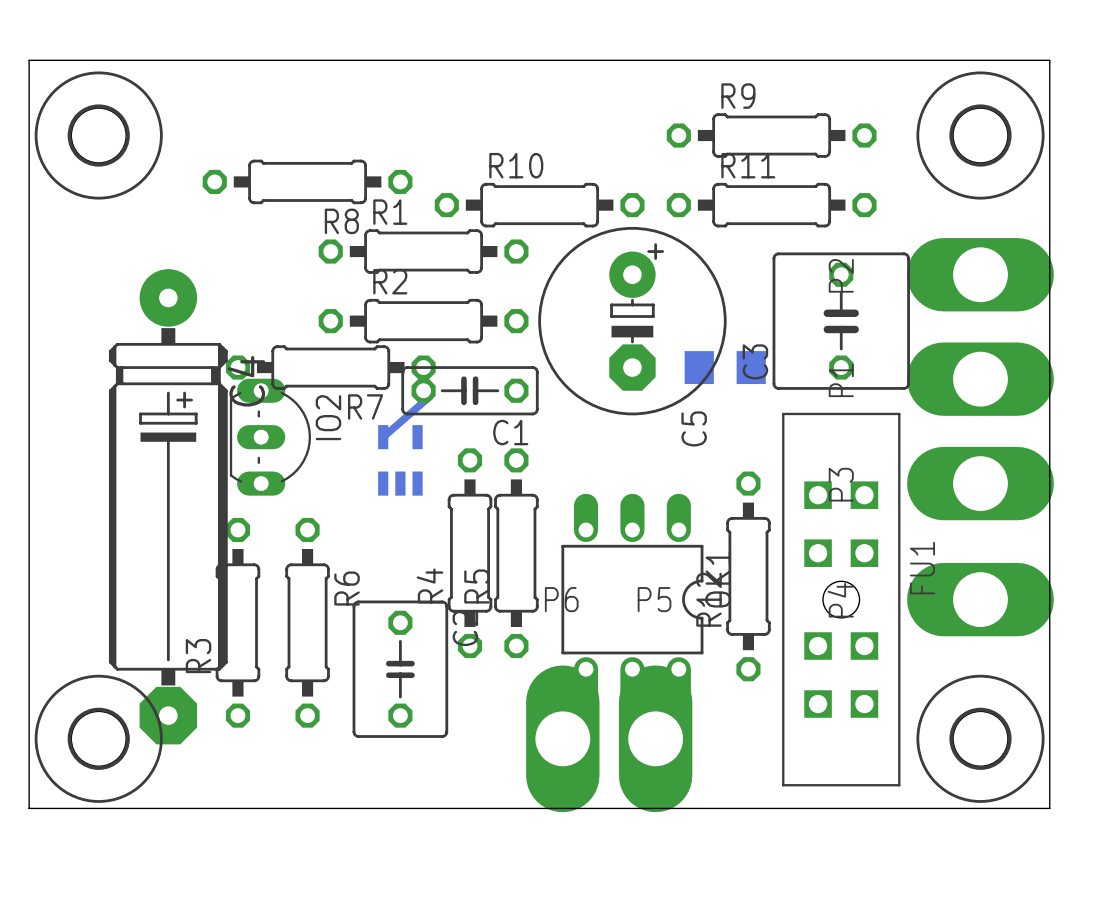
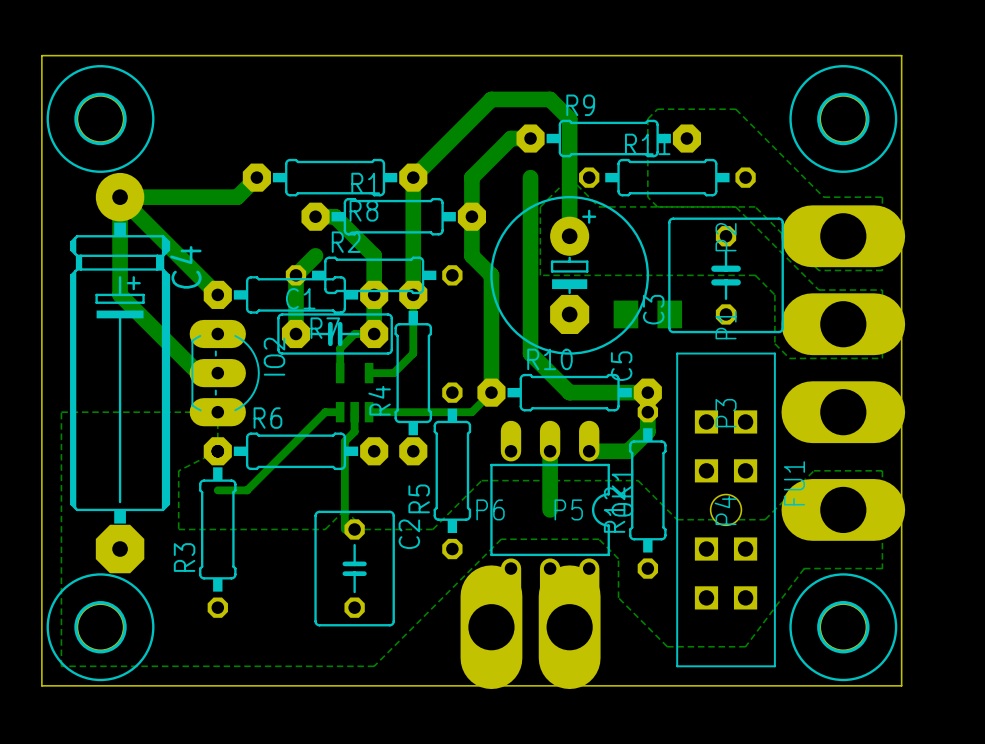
R9 footprint: [666, 113, 877, 158] -> [516, 119, 702, 158]
bottom track: none -> (530, 138) (511, 138) (471, 177) (471, 255) (491, 275) (491, 392) (471, 412) (369, 412)
R8 footprint: [202, 159, 413, 205] -> [242, 158, 428, 197]
R10 footprint: [434, 182, 645, 228] -> [477, 373, 662, 412]
bottom track: none -> (256, 177) (237, 197) (120, 197)
bottom track: none -> (530, 177) (530, 353) (569, 392) (647, 392) (647, 431) (628, 451) (589, 451)
bottom track: none -> (120, 197) (217, 294)
bottom track: none -> (120, 197) (120, 294) (198, 373) (217, 373)
R1 footprint: [318, 229, 529, 274] -> [301, 197, 486, 236]
bottom zone outline: none -> (657, 206) (647, 197) (647, 118) (657, 109) (735, 109) (823, 197) (882, 197) (882, 270) (818, 270) (755, 206) (598, 206) (569, 177) (540, 206) (540, 275) (755, 275) (774, 294) (774, 343) (789, 358) (882, 358) (882, 290) (818, 290) (735, 206)
bottom track: none -> (569, 236) (569, 118) (550, 99) (491, 99) (413, 177) (413, 353) (393, 373) (369, 373)
bottom track: none -> (315, 255) (295, 275) (295, 334)
C5 position: (632, 321) -> (569, 275)
R7 footprint: [225, 345, 436, 390] -> [203, 276, 389, 314]
C1 footprint: [401, 366, 539, 416] -> [277, 313, 393, 355]
part position: (725, 367) -> (647, 314)
IO2 footprint: [229, 378, 312, 496] -> [189, 319, 260, 427]
bottom track: (423, 390) (429, 396) (383, 437) -> (315, 216) (335, 216) (374, 255) (374, 334) (354, 334) (340, 348) (340, 373)
C1 name position: C1 (510, 432) -> C1 (300, 298)
R4 footprint: [447, 448, 493, 659] -> [394, 280, 433, 466]
bottom zone outline: none -> (61, 412) (61, 666) (374, 666) (501, 539) (598, 539) (618, 558) (618, 597) (667, 646) (745, 646) (804, 568) (882, 568) (882, 470) (813, 470) (765, 519) (677, 519) (638, 480) (481, 480) (432, 529) (364, 529) (344, 509) (325, 529) (178, 529) (178, 470) (217, 451) (217, 412) (61, 412)
bottom track: none -> (340, 412) (325, 412) (247, 490) (217, 490)
bottom track: none -> (354, 412) (354, 431) (344, 441) (344, 529)
C4 position: (168, 506) -> (120, 373)
R6 footprint: [285, 517, 330, 728] -> [203, 432, 389, 471]
bottom track: none -> (550, 451) (550, 509)
R6 name position: R6 (347, 588) -> R6 (267, 418)

